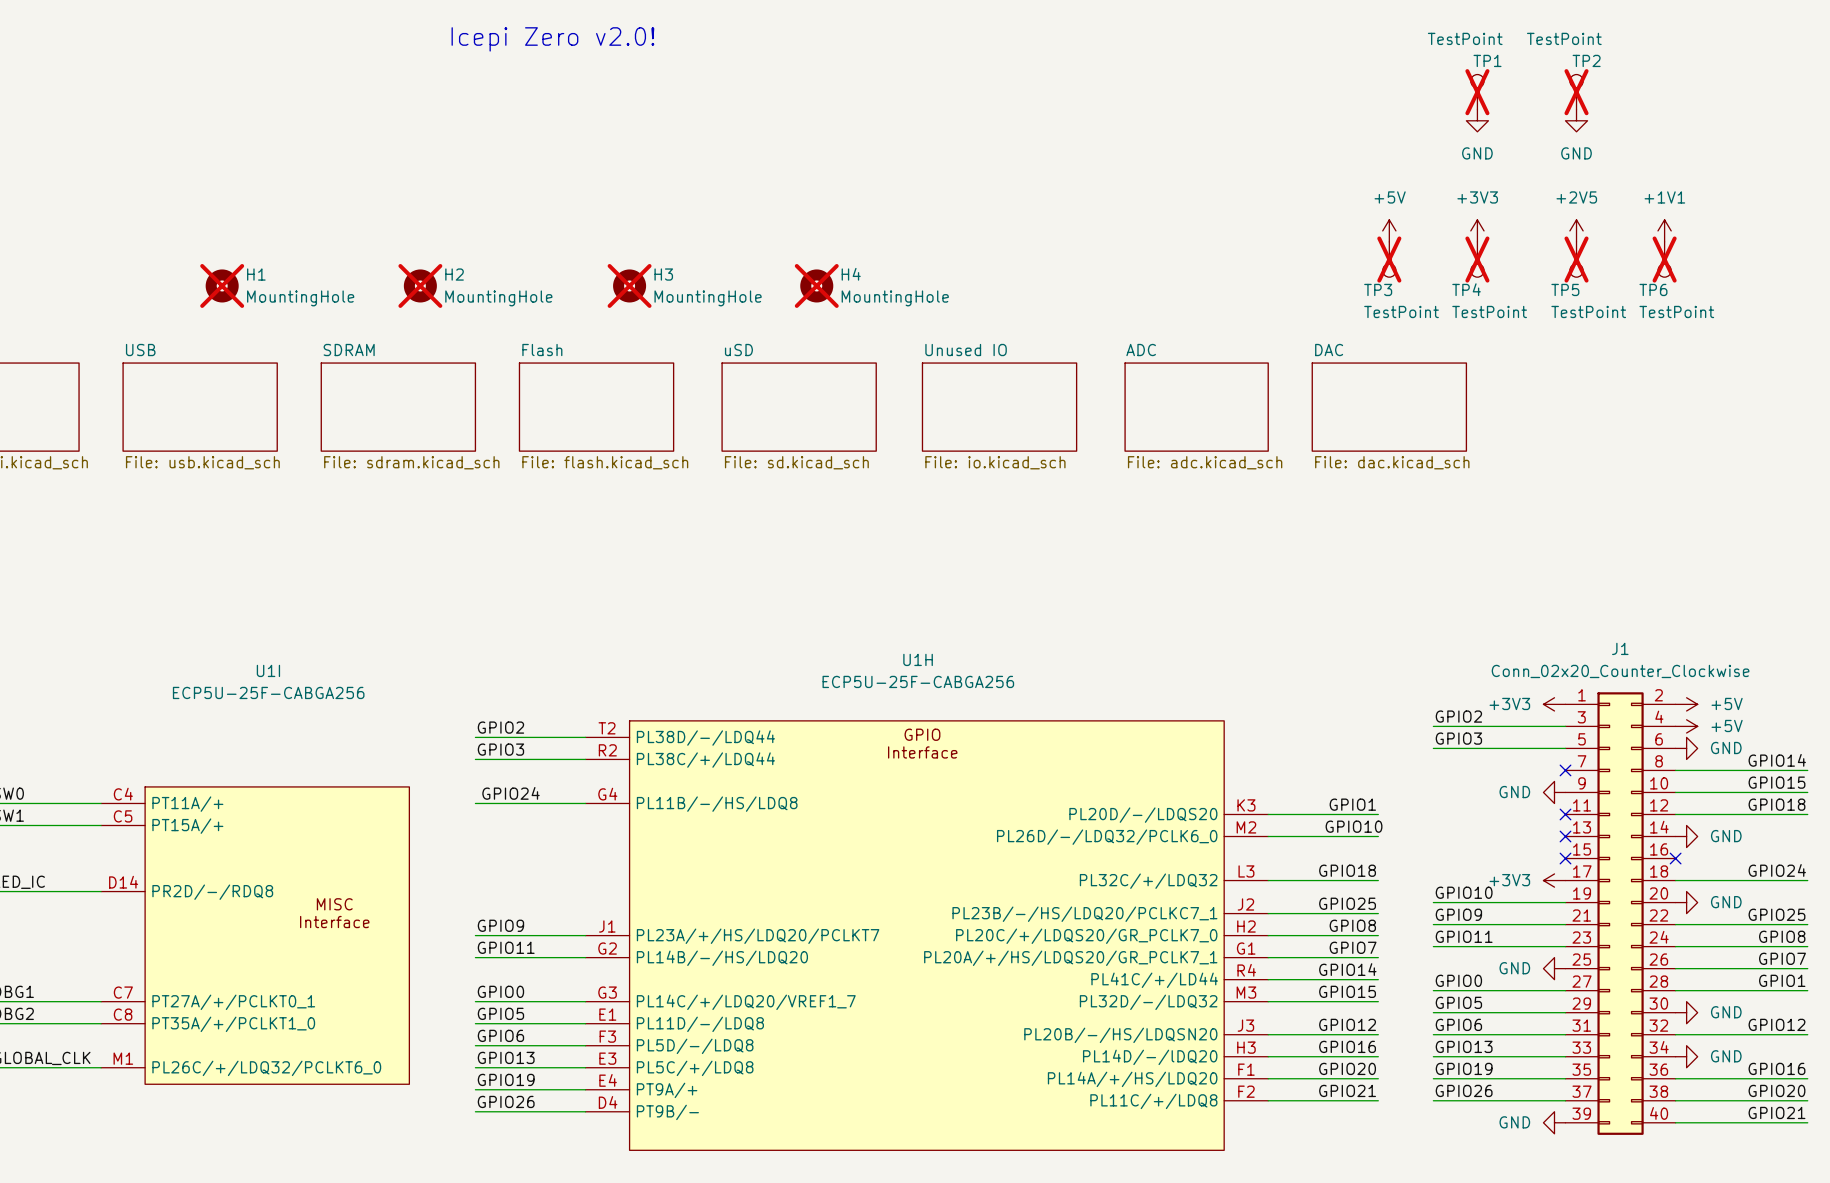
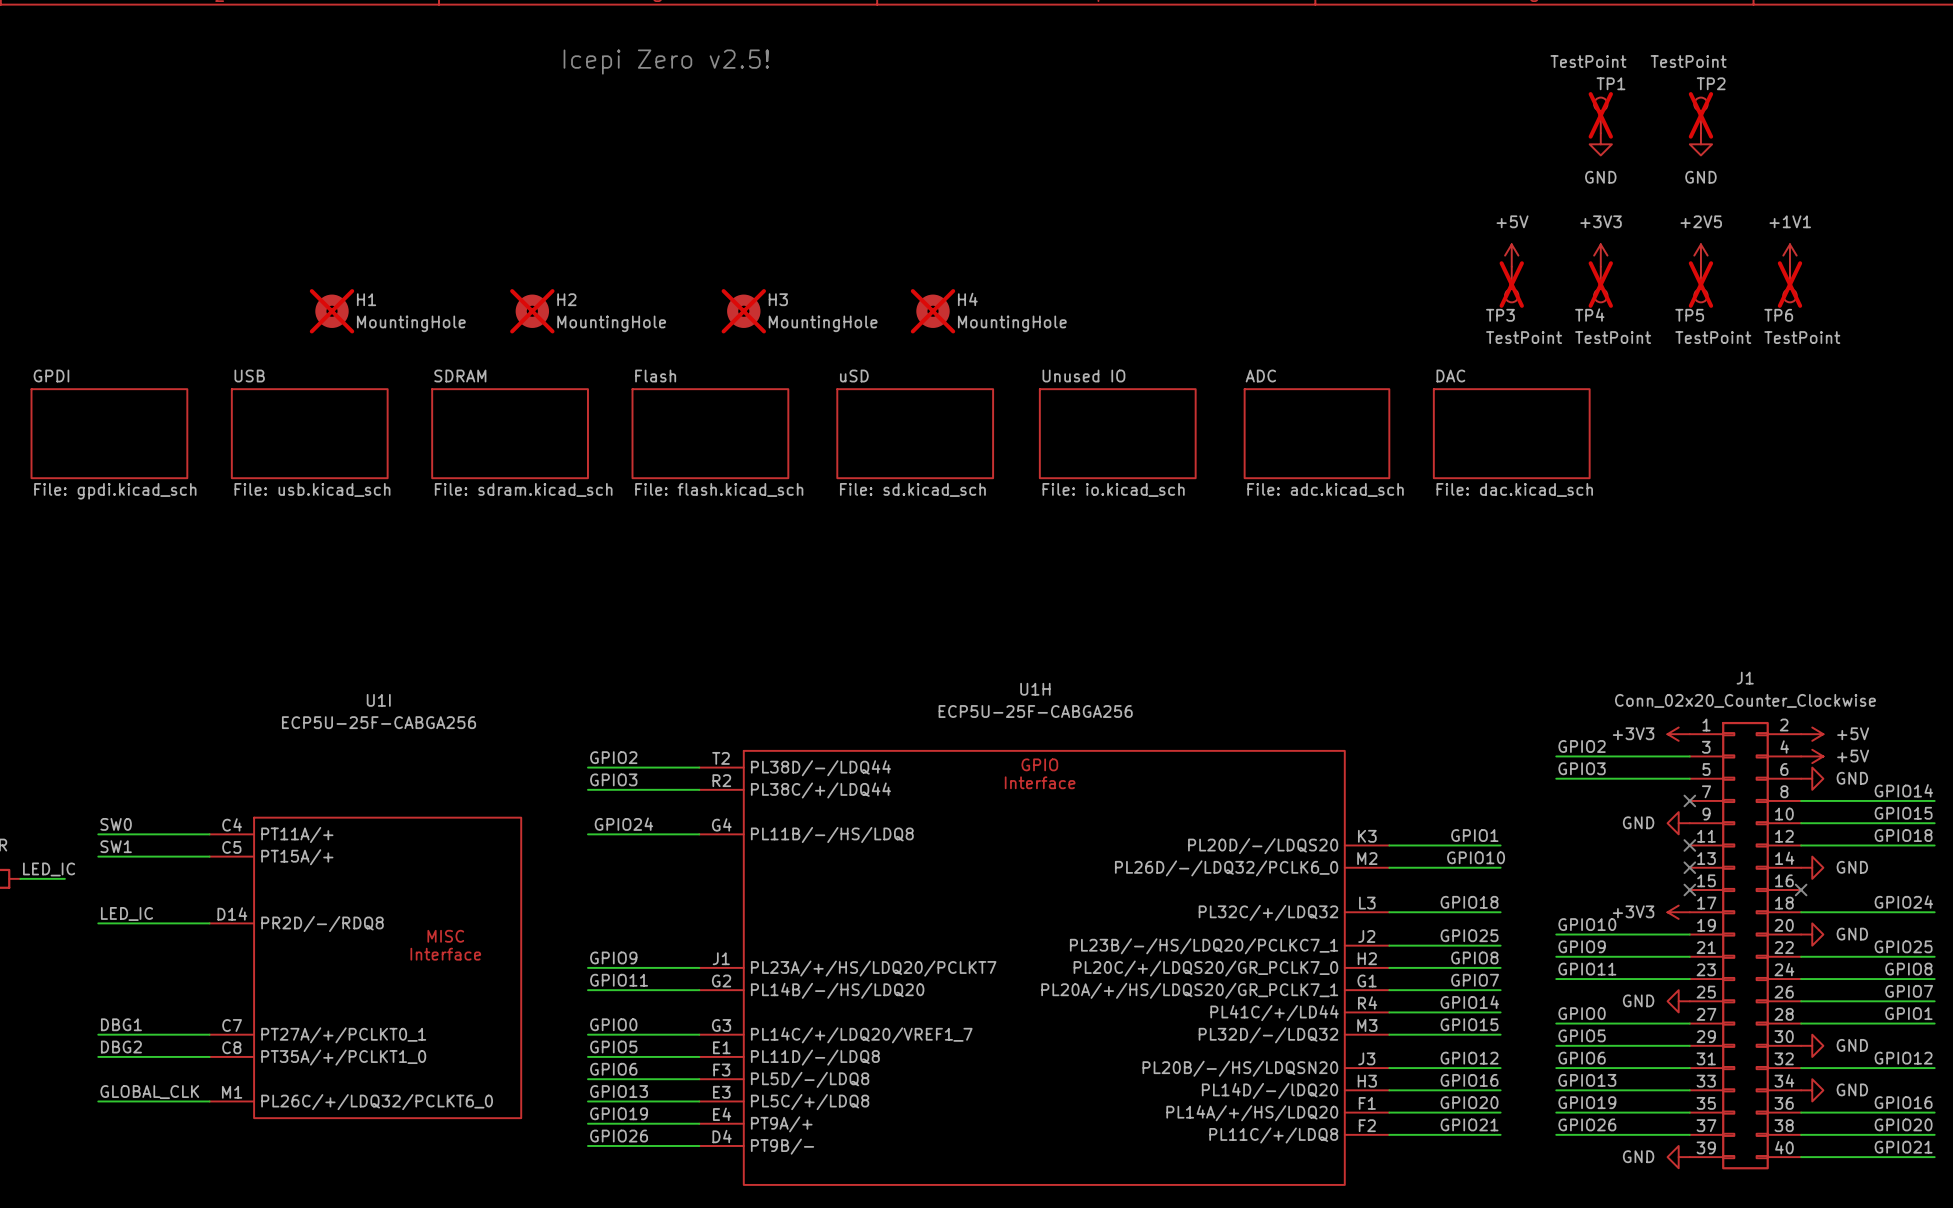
text: Icepi Zero v2.0! (552, 39) -> Icepi Zero v2.5! (666, 62)

